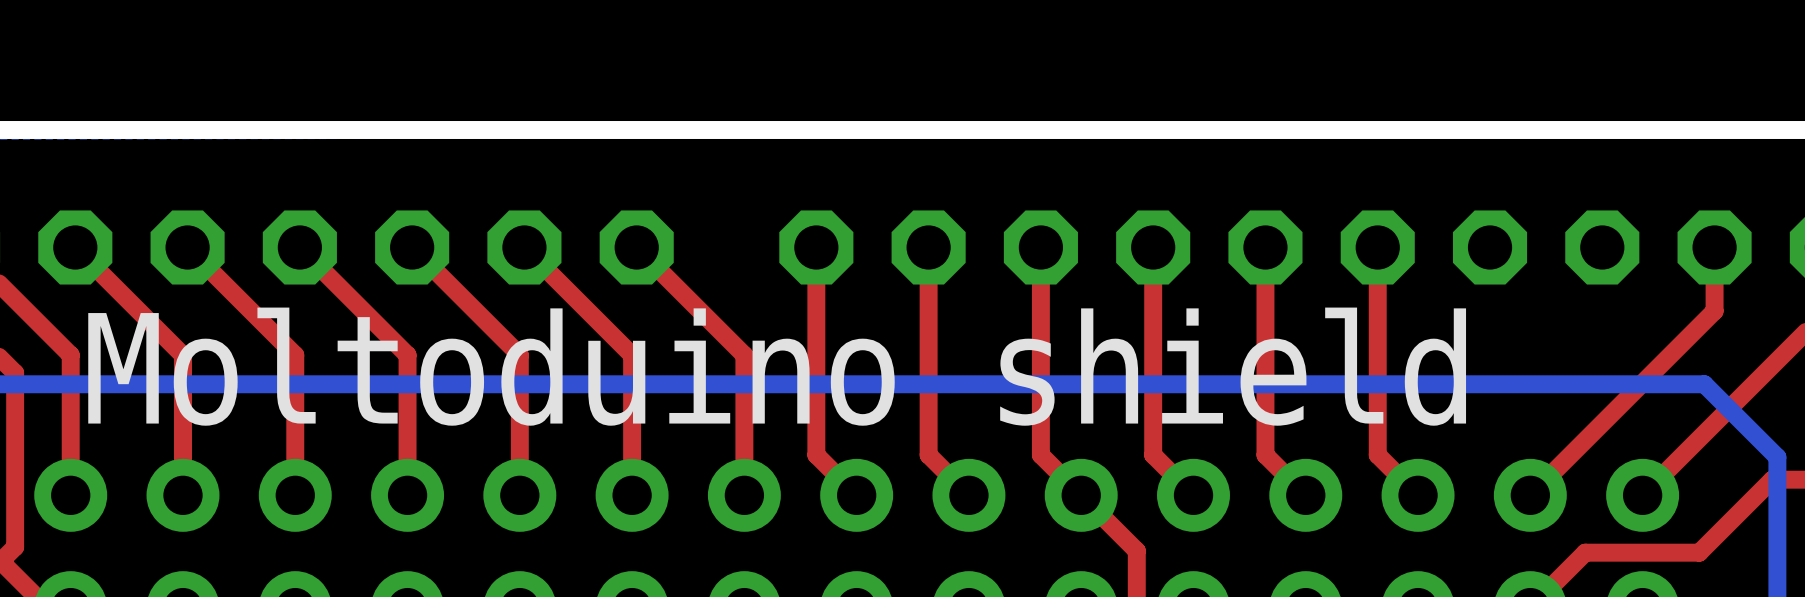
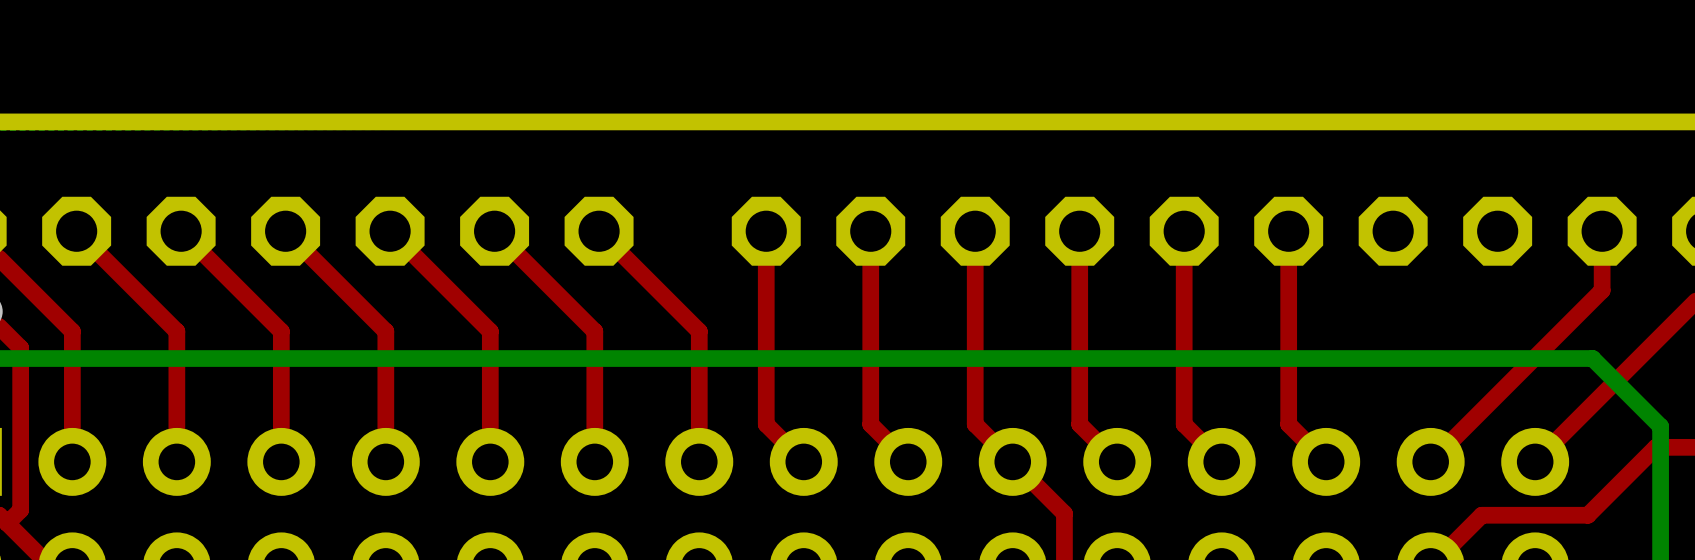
text: Moltoduino shield (777, 366) -> none

